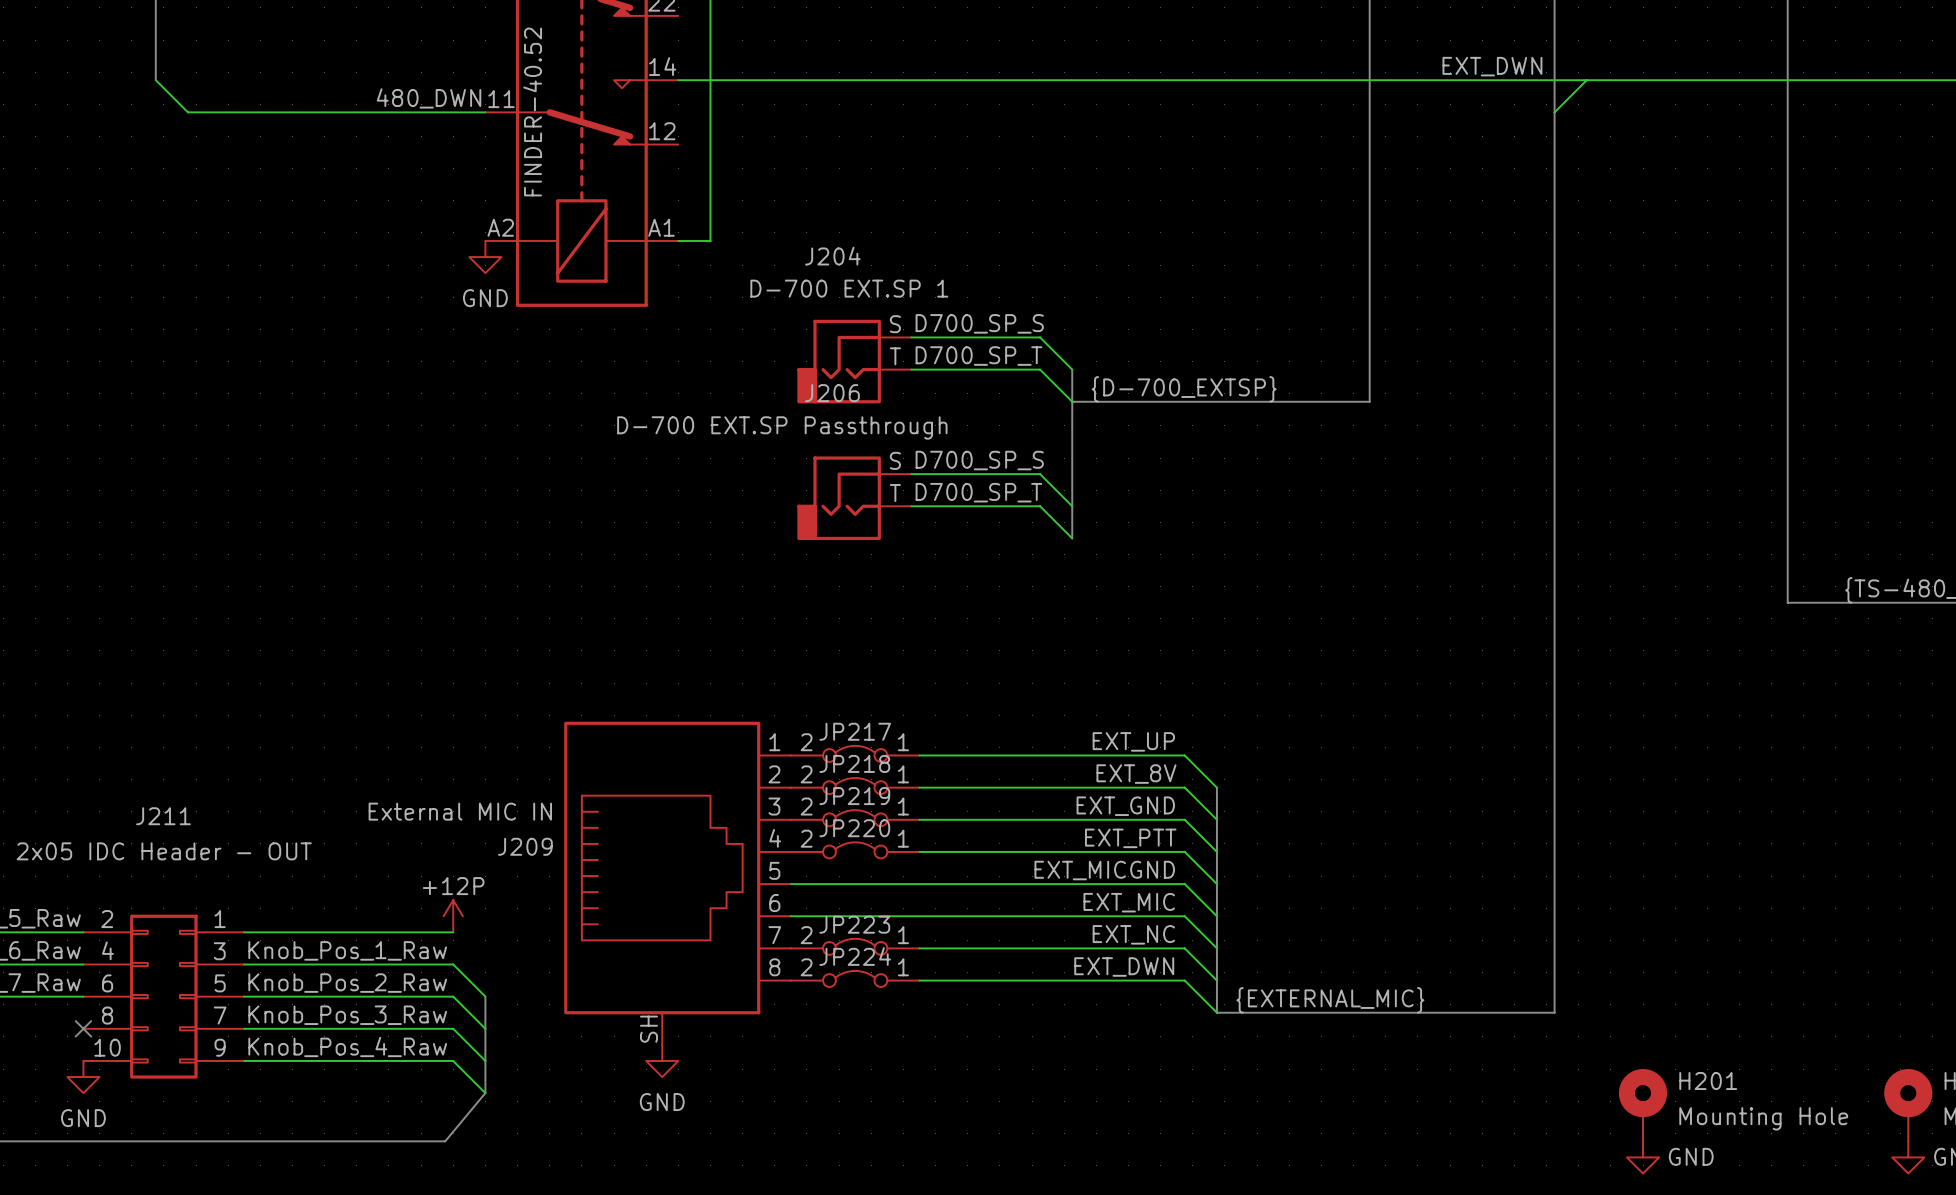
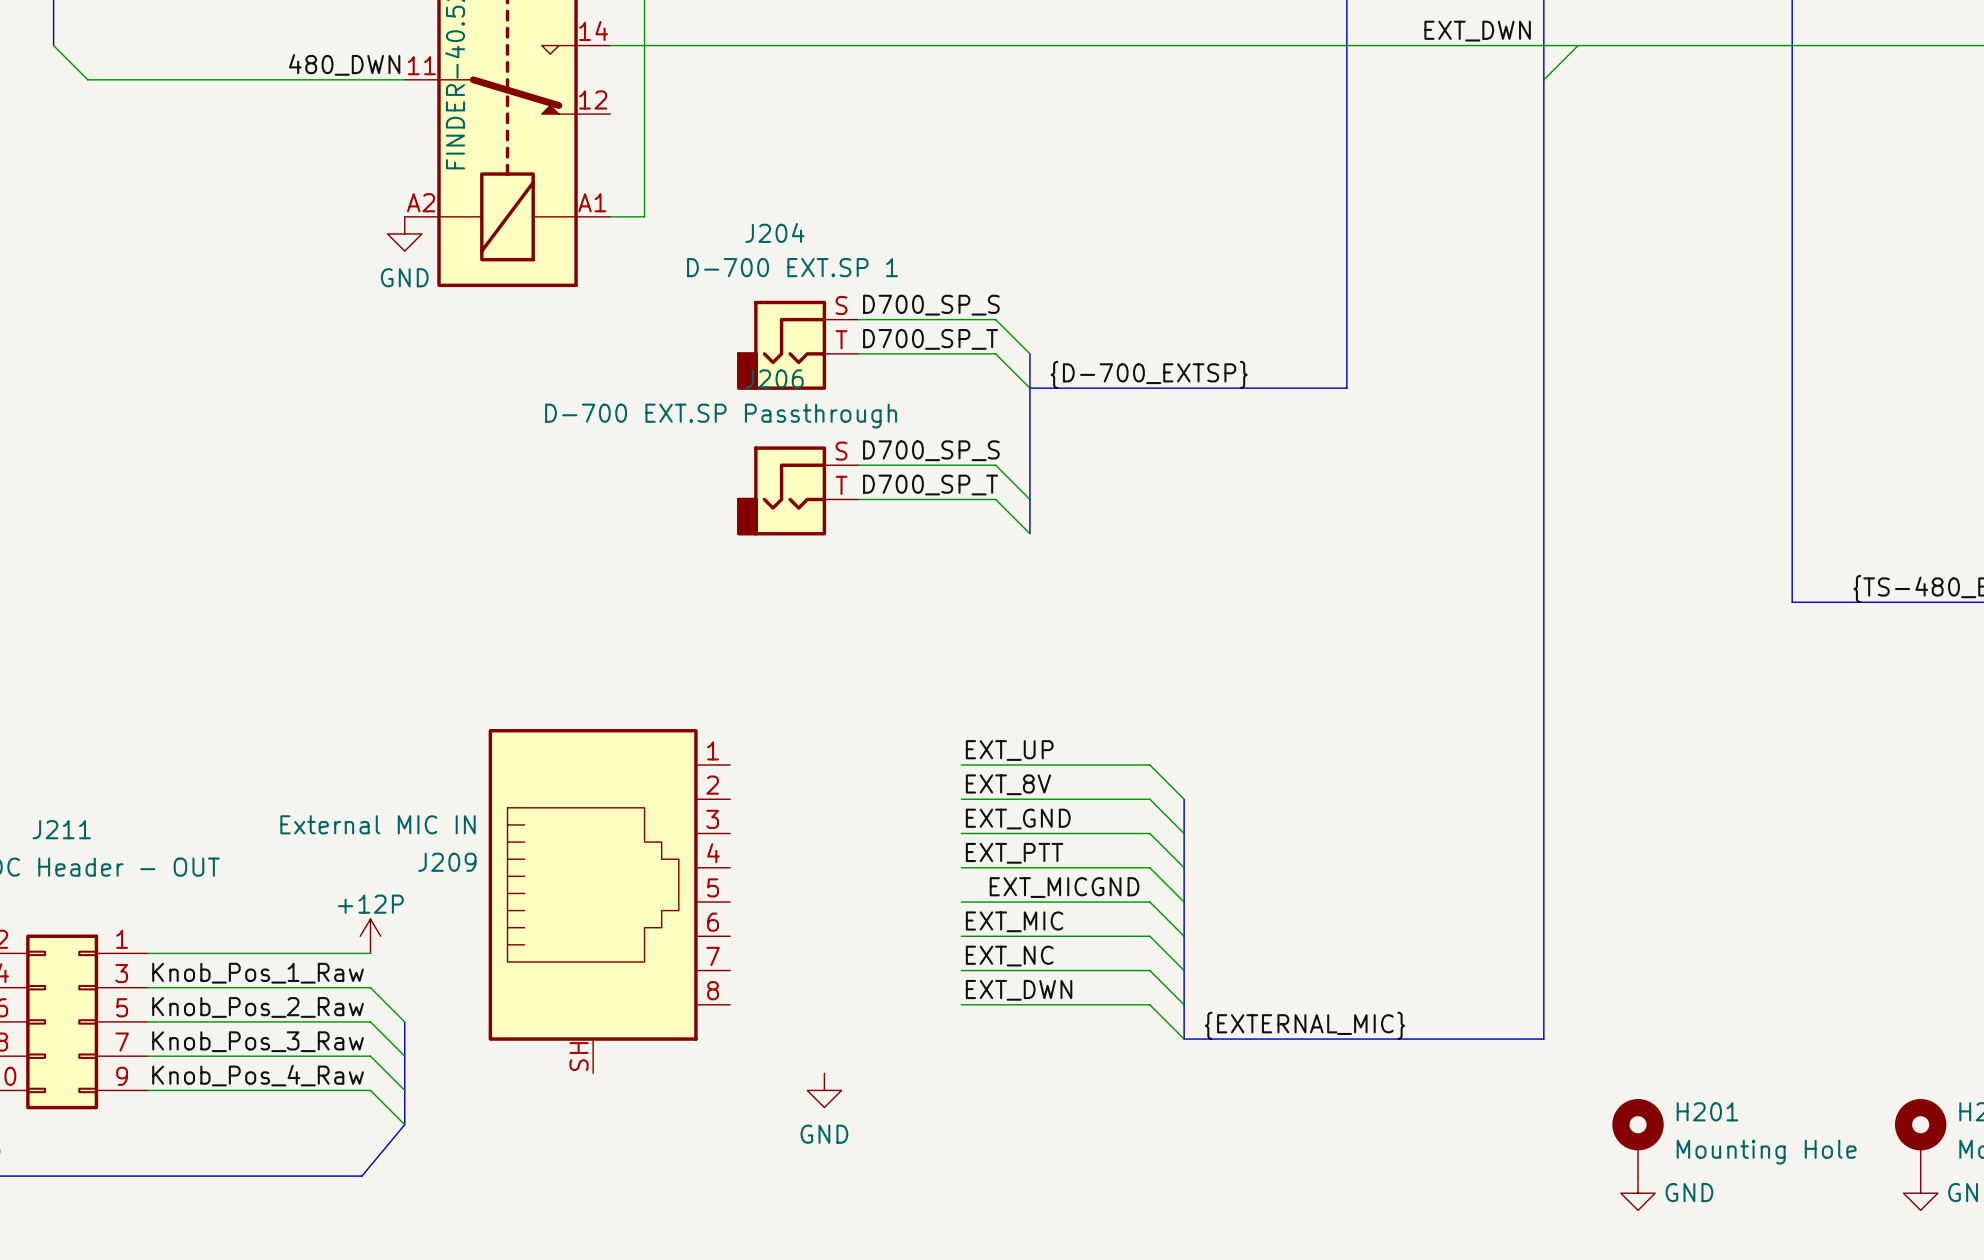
label position: EXT_UP (1133, 741) -> EXT_UP (1009, 750)
JP217: (855, 753) -> none
wire: (919, 755) (1007, 755) -> none
label position: EXT_8V (1136, 774) -> EXT_8V (1008, 784)
JP218: (855, 786) -> none
wire: (919, 787) (1007, 787) -> none
label position: EXT_GND (1125, 806) -> EXT_GND (1018, 819)
JP219: (855, 818) -> none
wire: (919, 819) (1007, 819) -> none
label position: EXT_PTT (1130, 838) -> EXT_PTT (1014, 853)
JP220: (855, 850) -> none
wire: (919, 851) (1007, 851) -> none
wire: (790, 884) (1007, 884) -> none
label position: EXT_MIC (1129, 902) -> EXT_MIC (1014, 921)
wire: (790, 916) (1007, 916) -> none
label position: EXT_NC (1133, 934) -> EXT_NC (1009, 956)
JP223: (855, 946) -> none
wire: (919, 948) (1007, 948) -> none
label position: EXT_DWN (1124, 966) -> EXT_DWN (1019, 990)
JP224: (855, 978) -> none
wire: (919, 980) (1007, 980) -> none
power symbol position: GND (662, 1060) -> GND (824, 1090)

